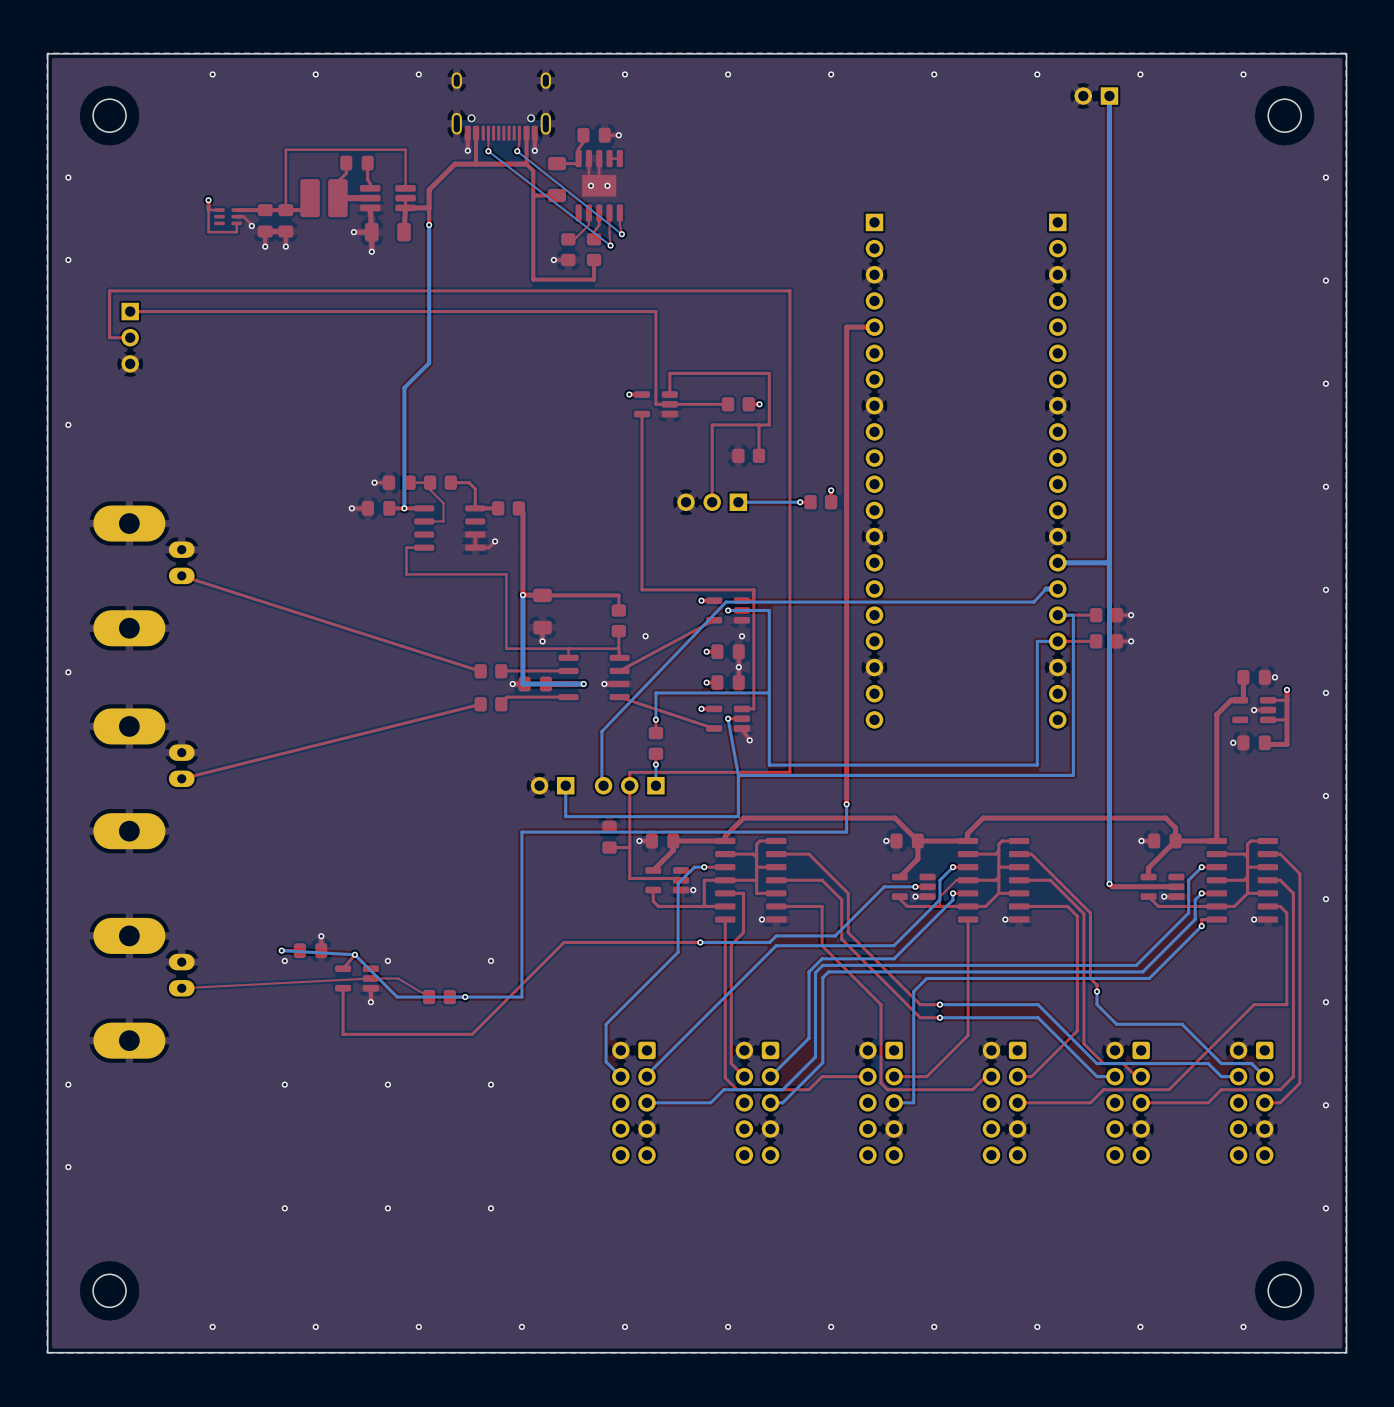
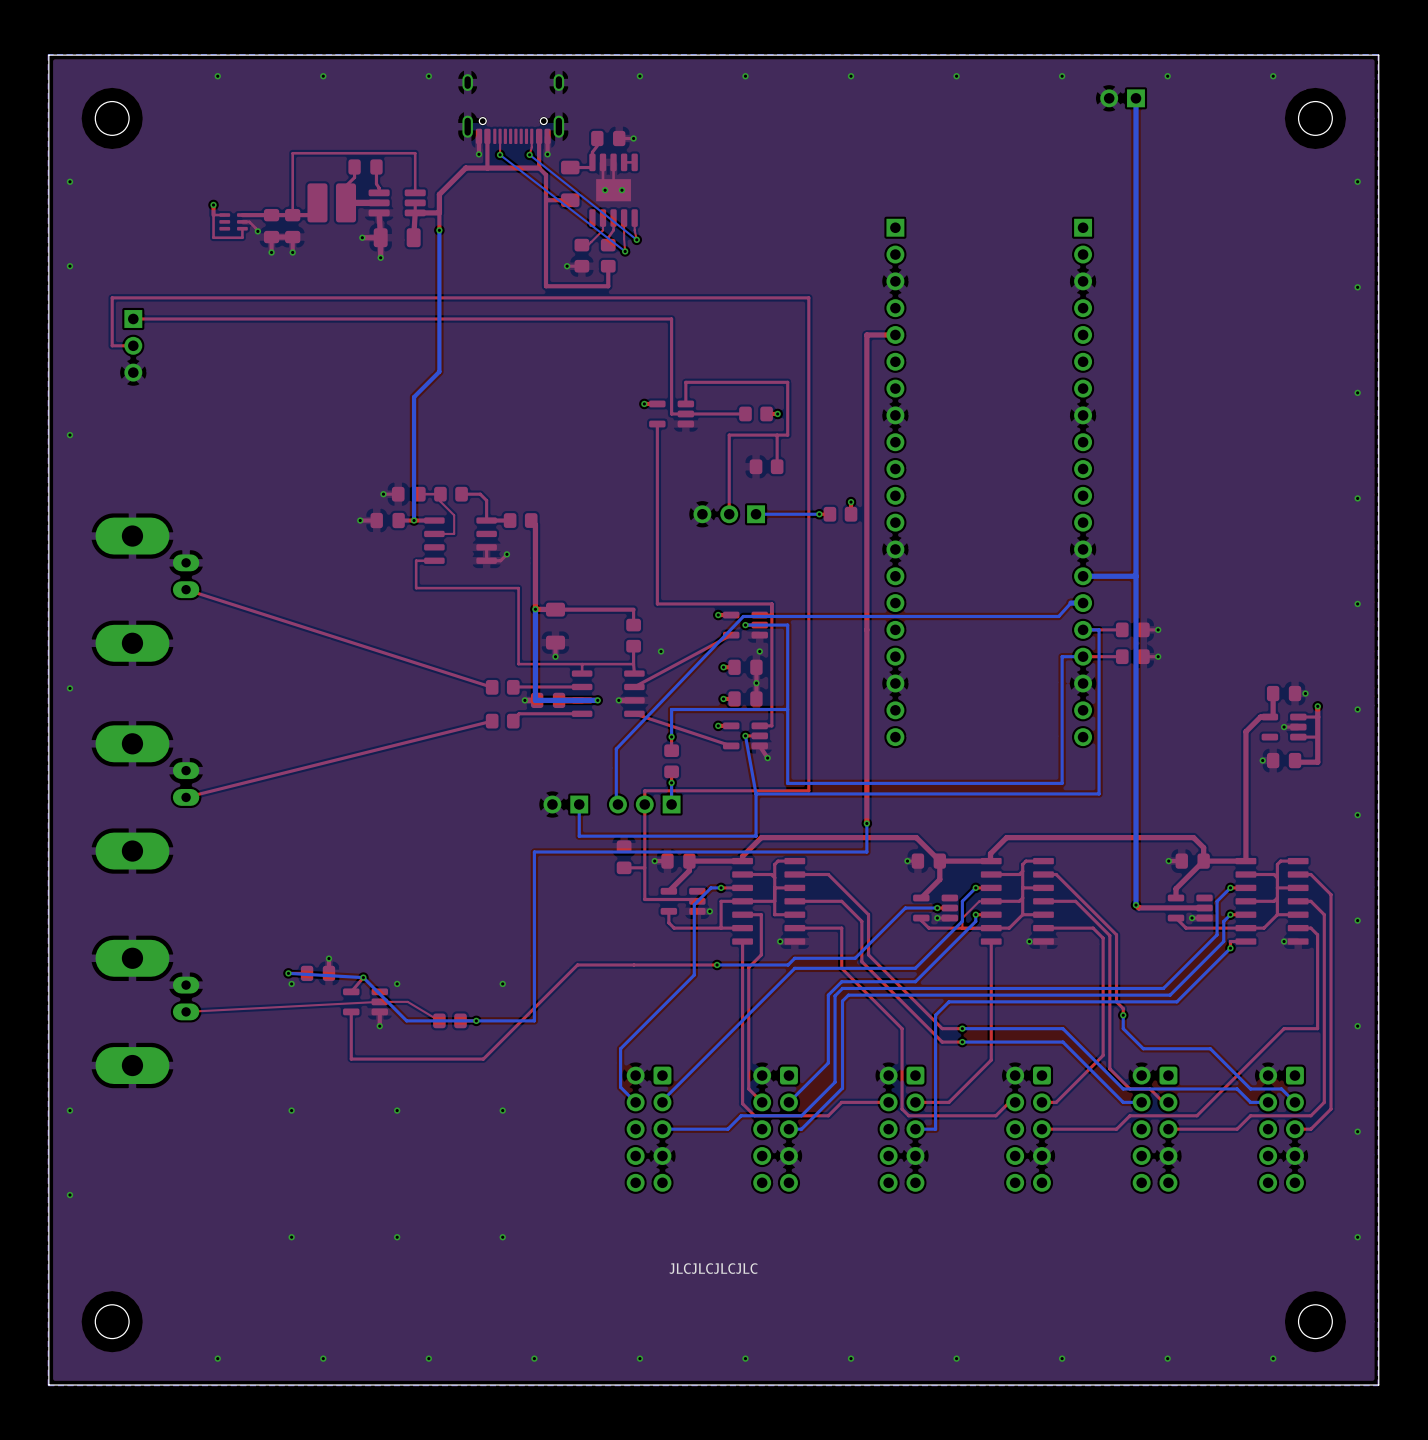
text: none -> JLCJLCJLCJLC (713, 1268)

